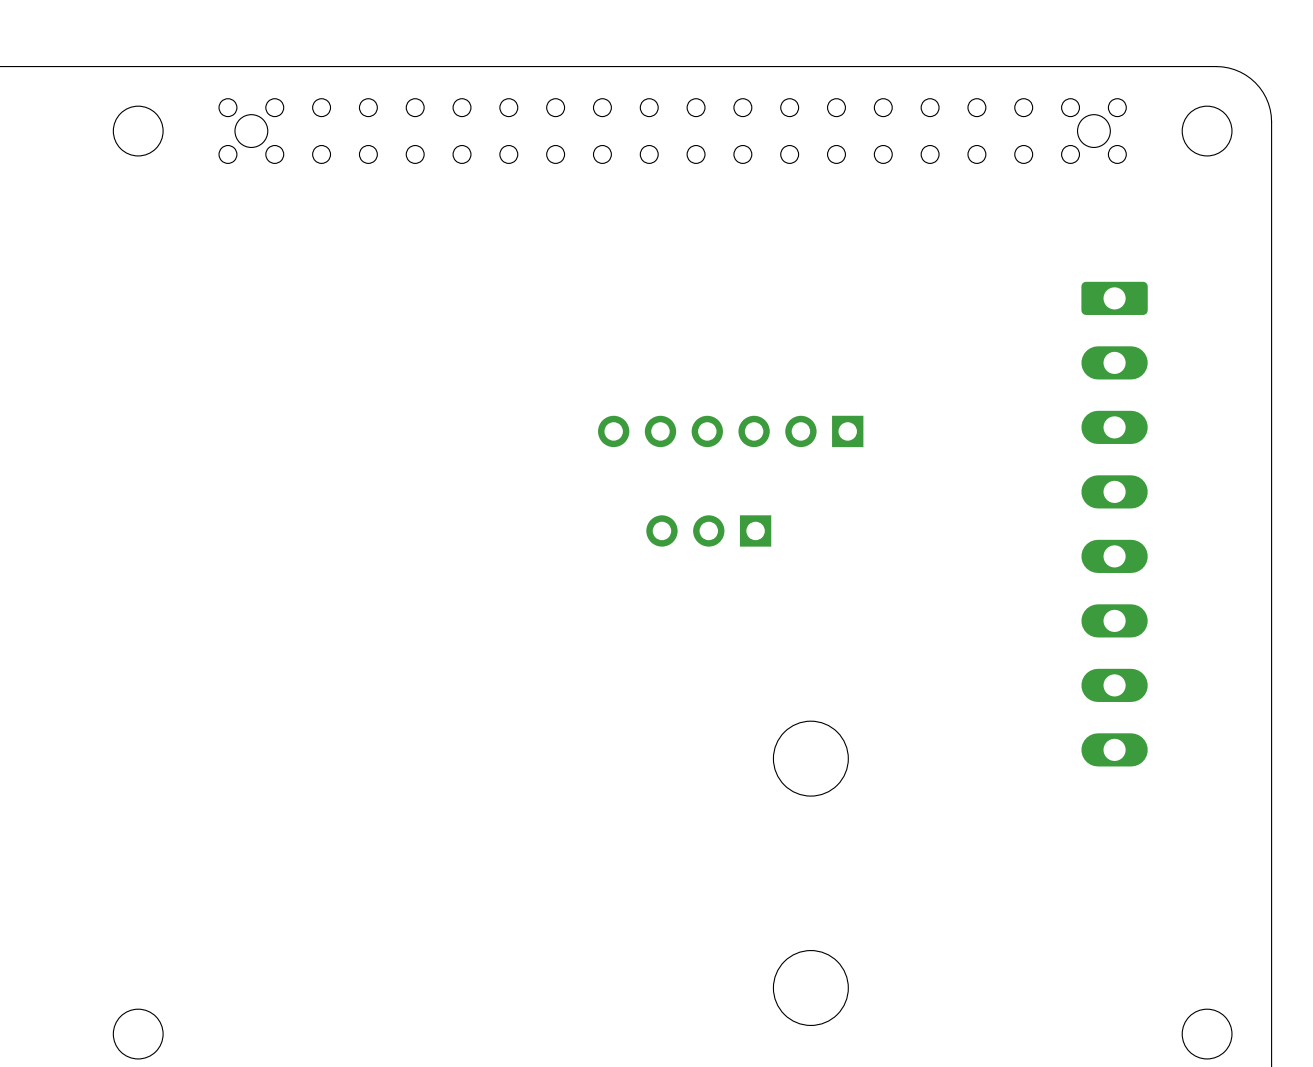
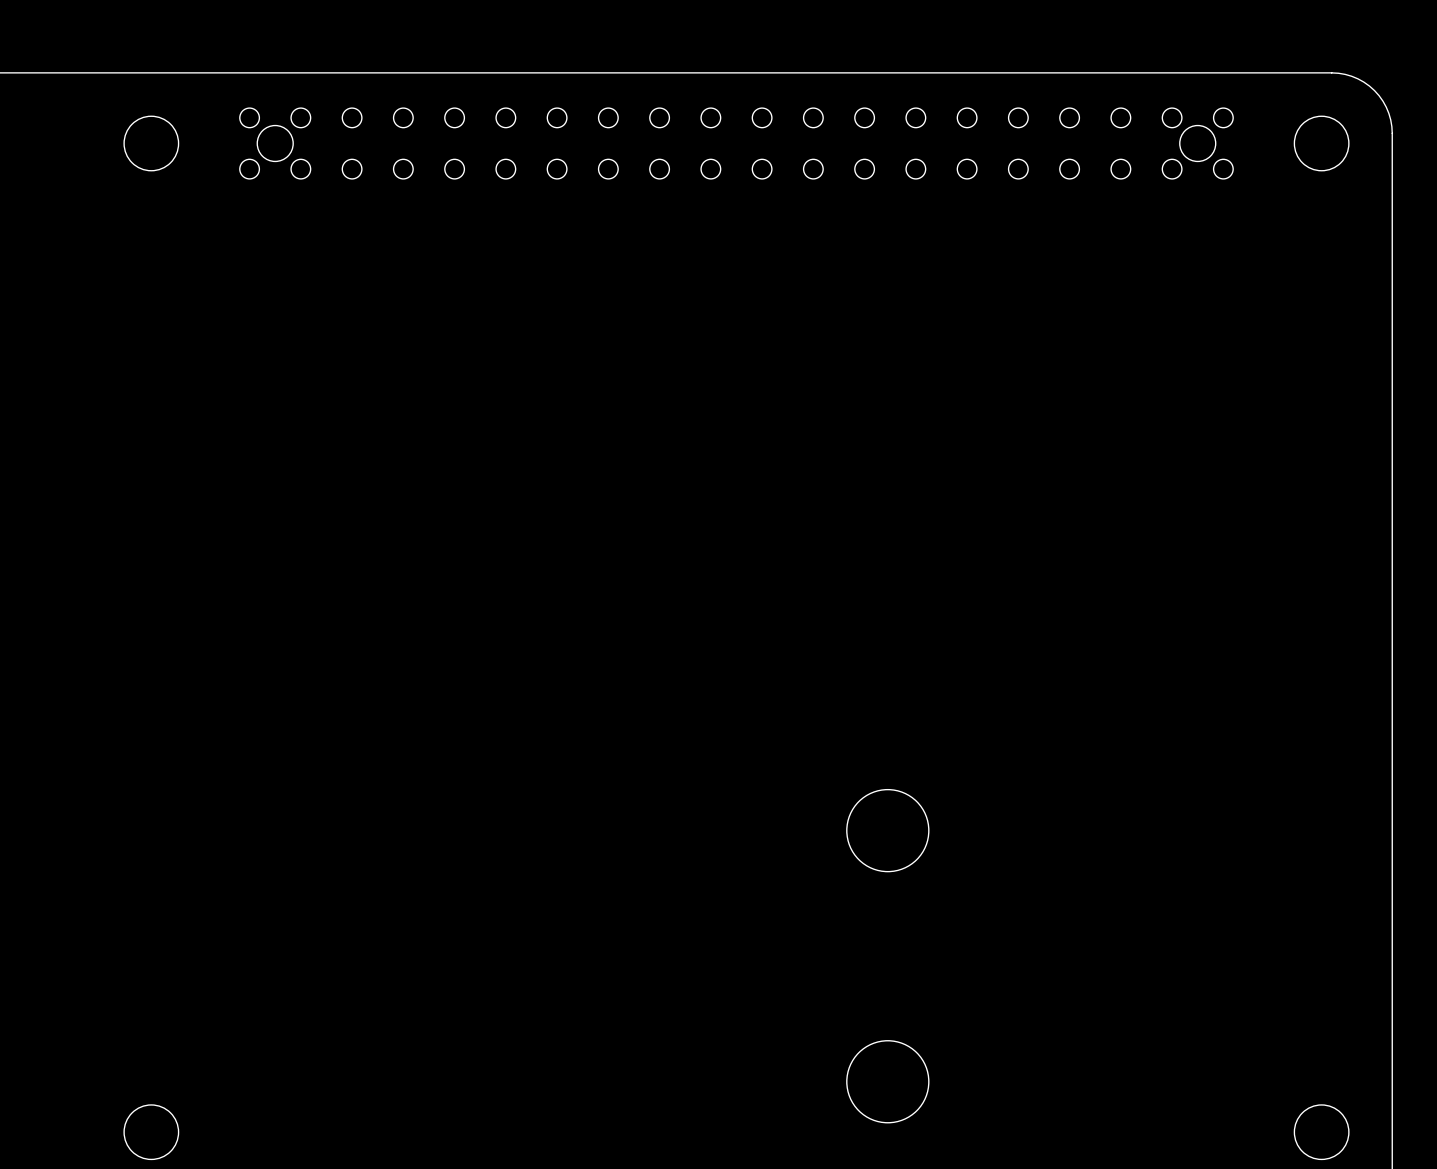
part: (730, 431) -> none
part: (1114, 524) -> none
part: (708, 530) -> none

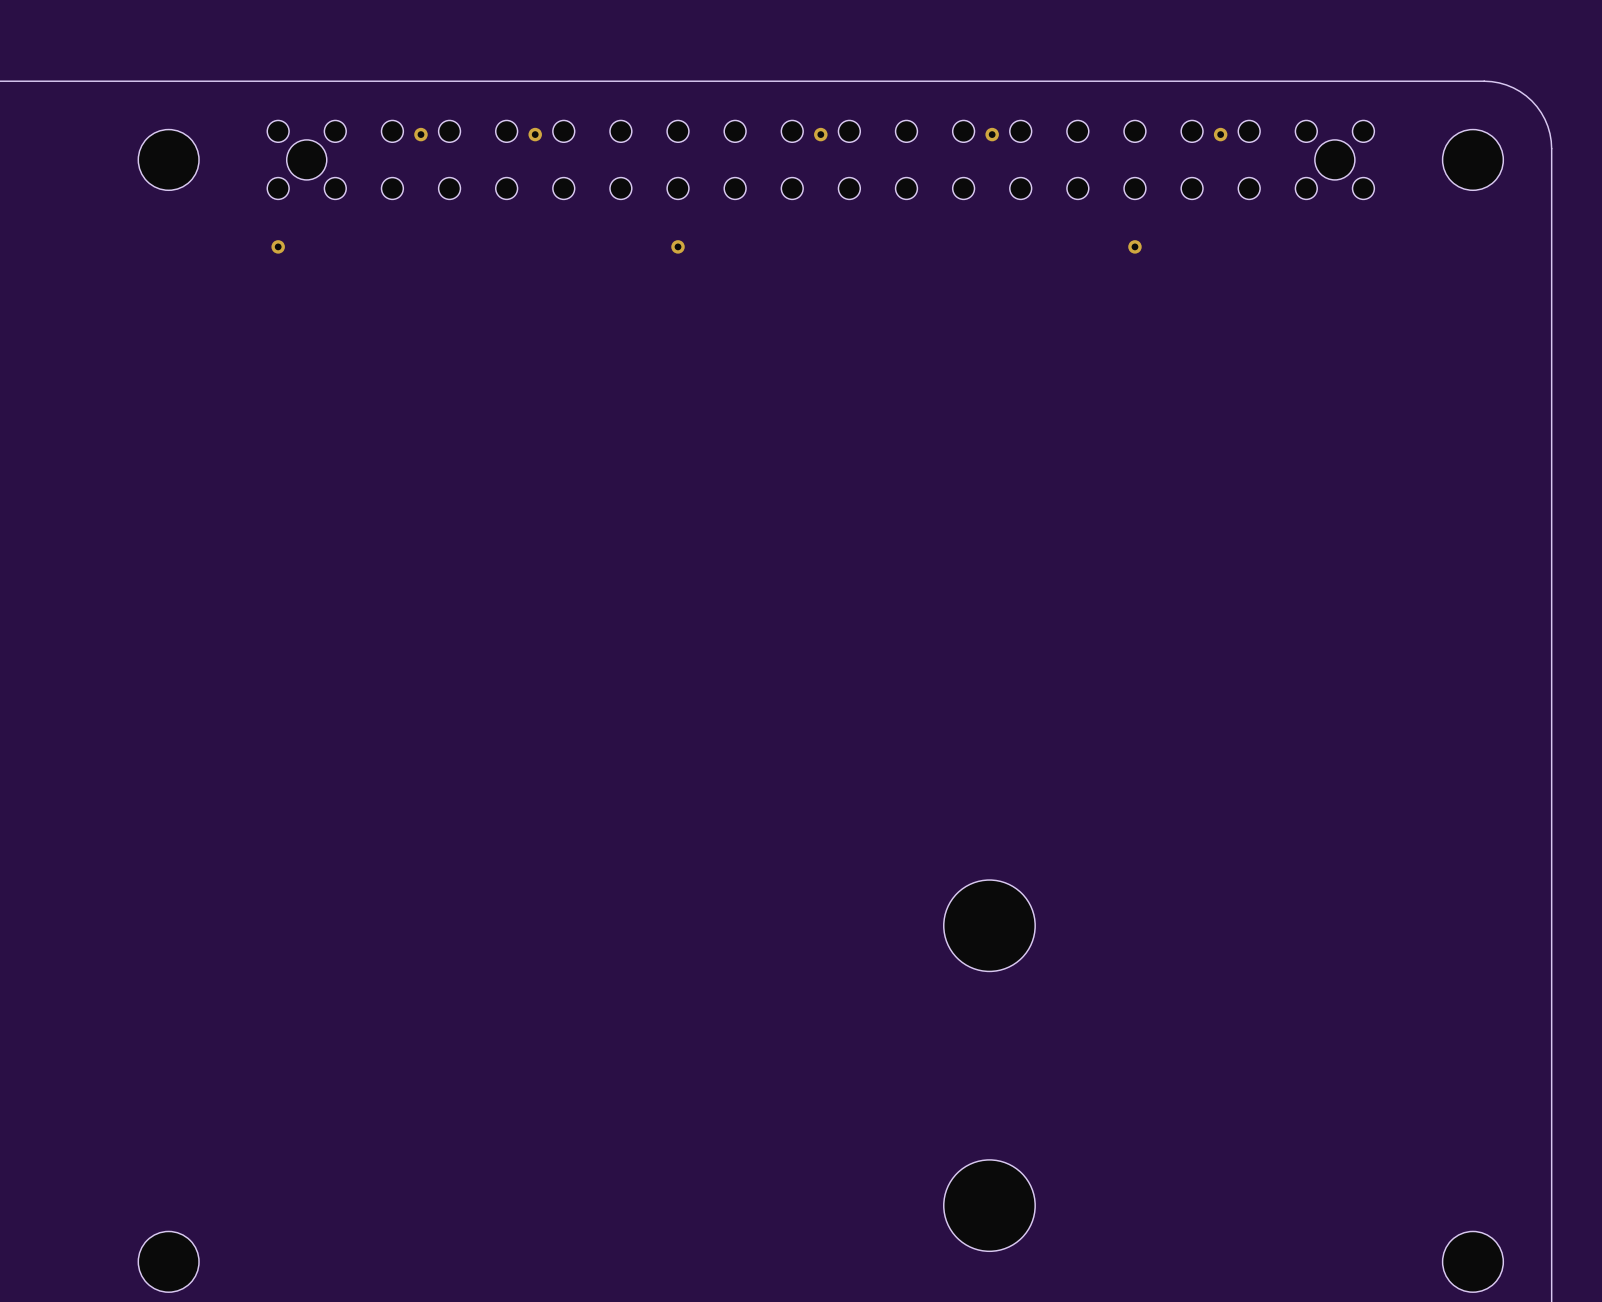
via: none -> (420, 134)
via: none -> (535, 134)
via: none -> (820, 134)
via: none -> (992, 134)
via: none -> (1220, 134)
via: none -> (278, 246)
via: none -> (678, 246)
via: none -> (1134, 246)

